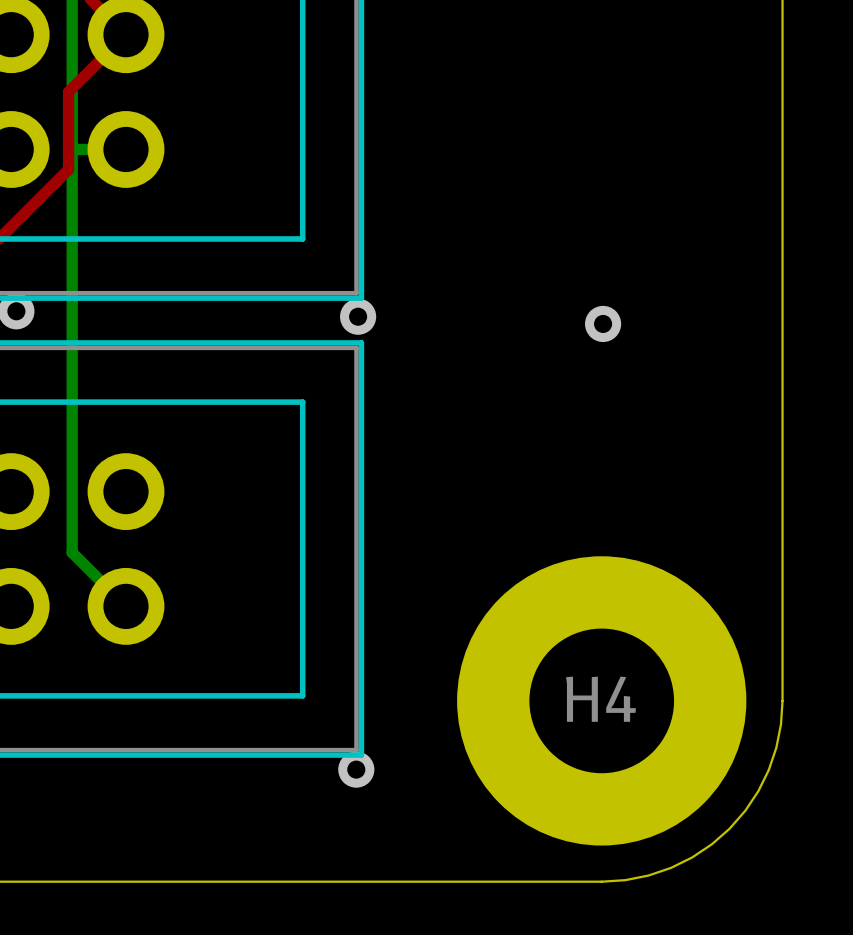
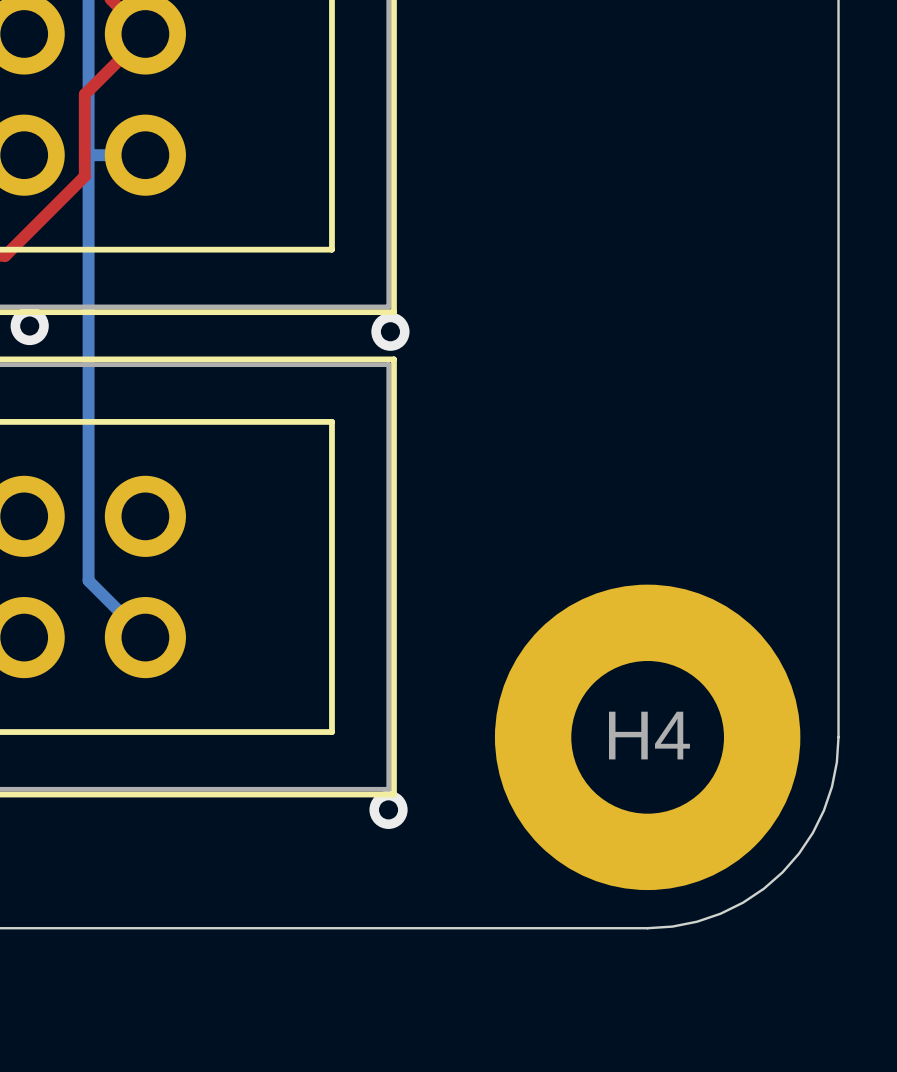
via: (603, 323) -> none

